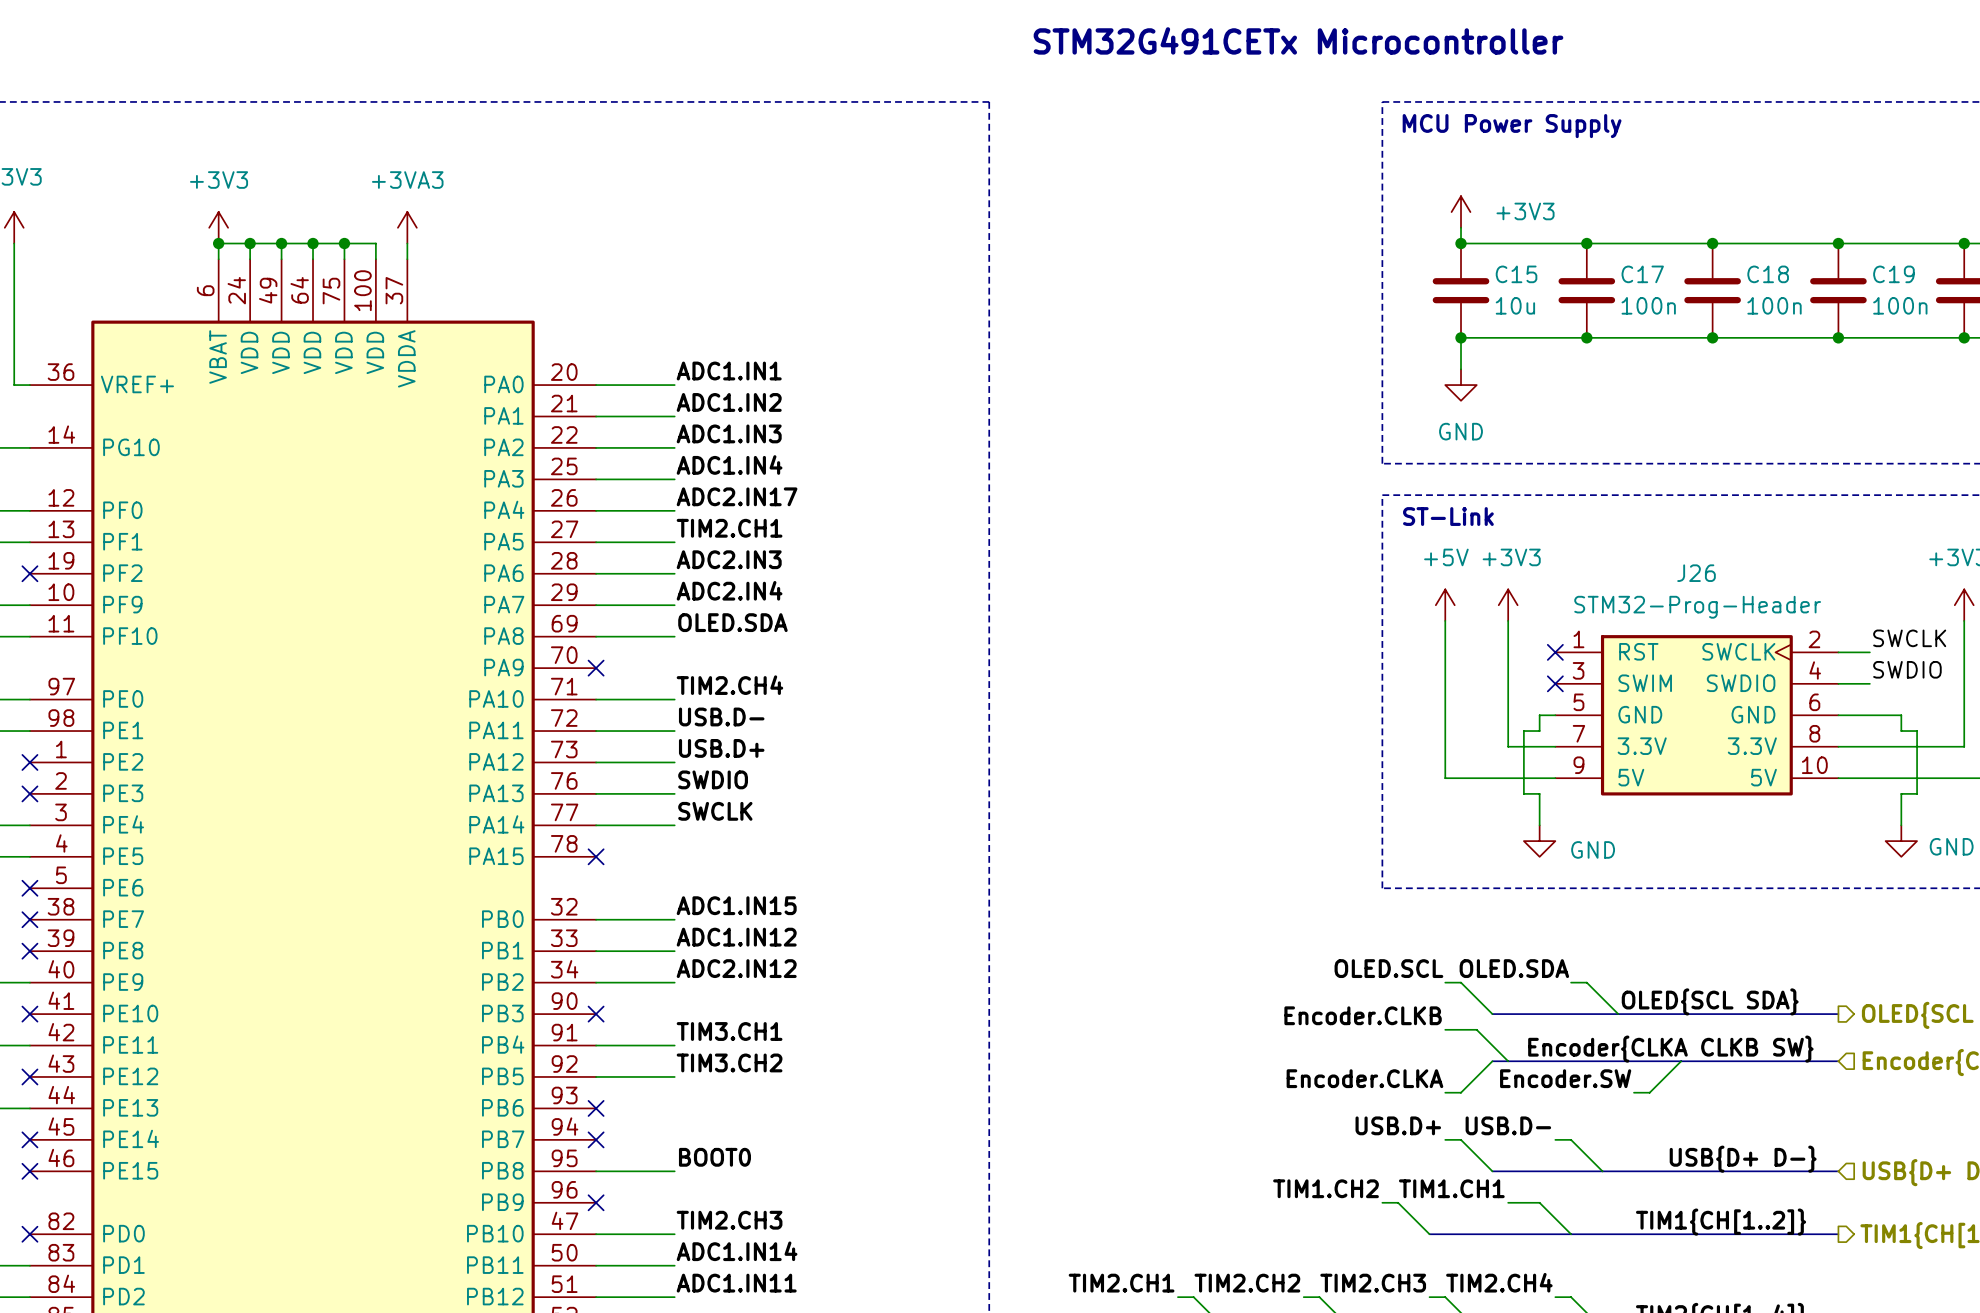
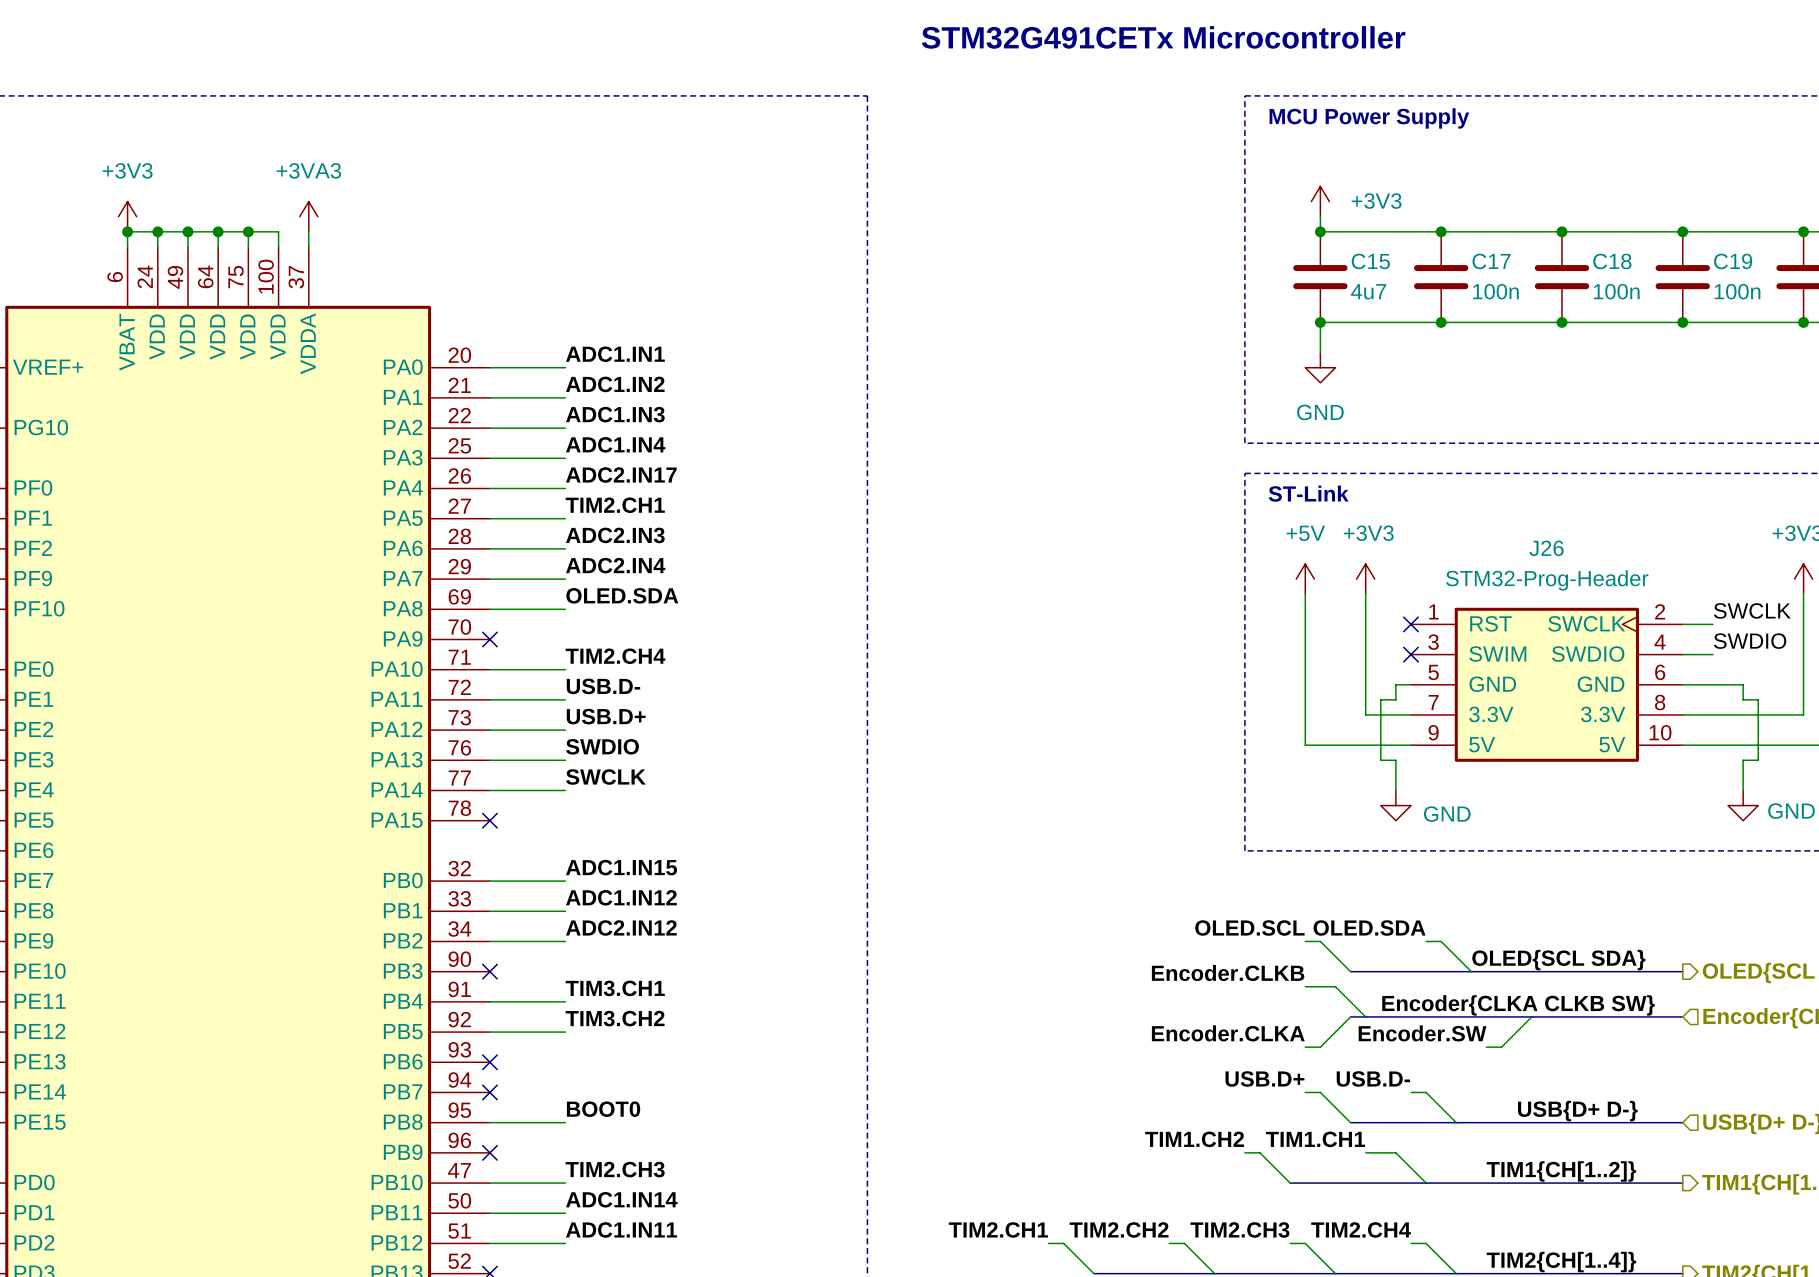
C15 value: 10u (1515, 305) -> 4u7 (1368, 291)

